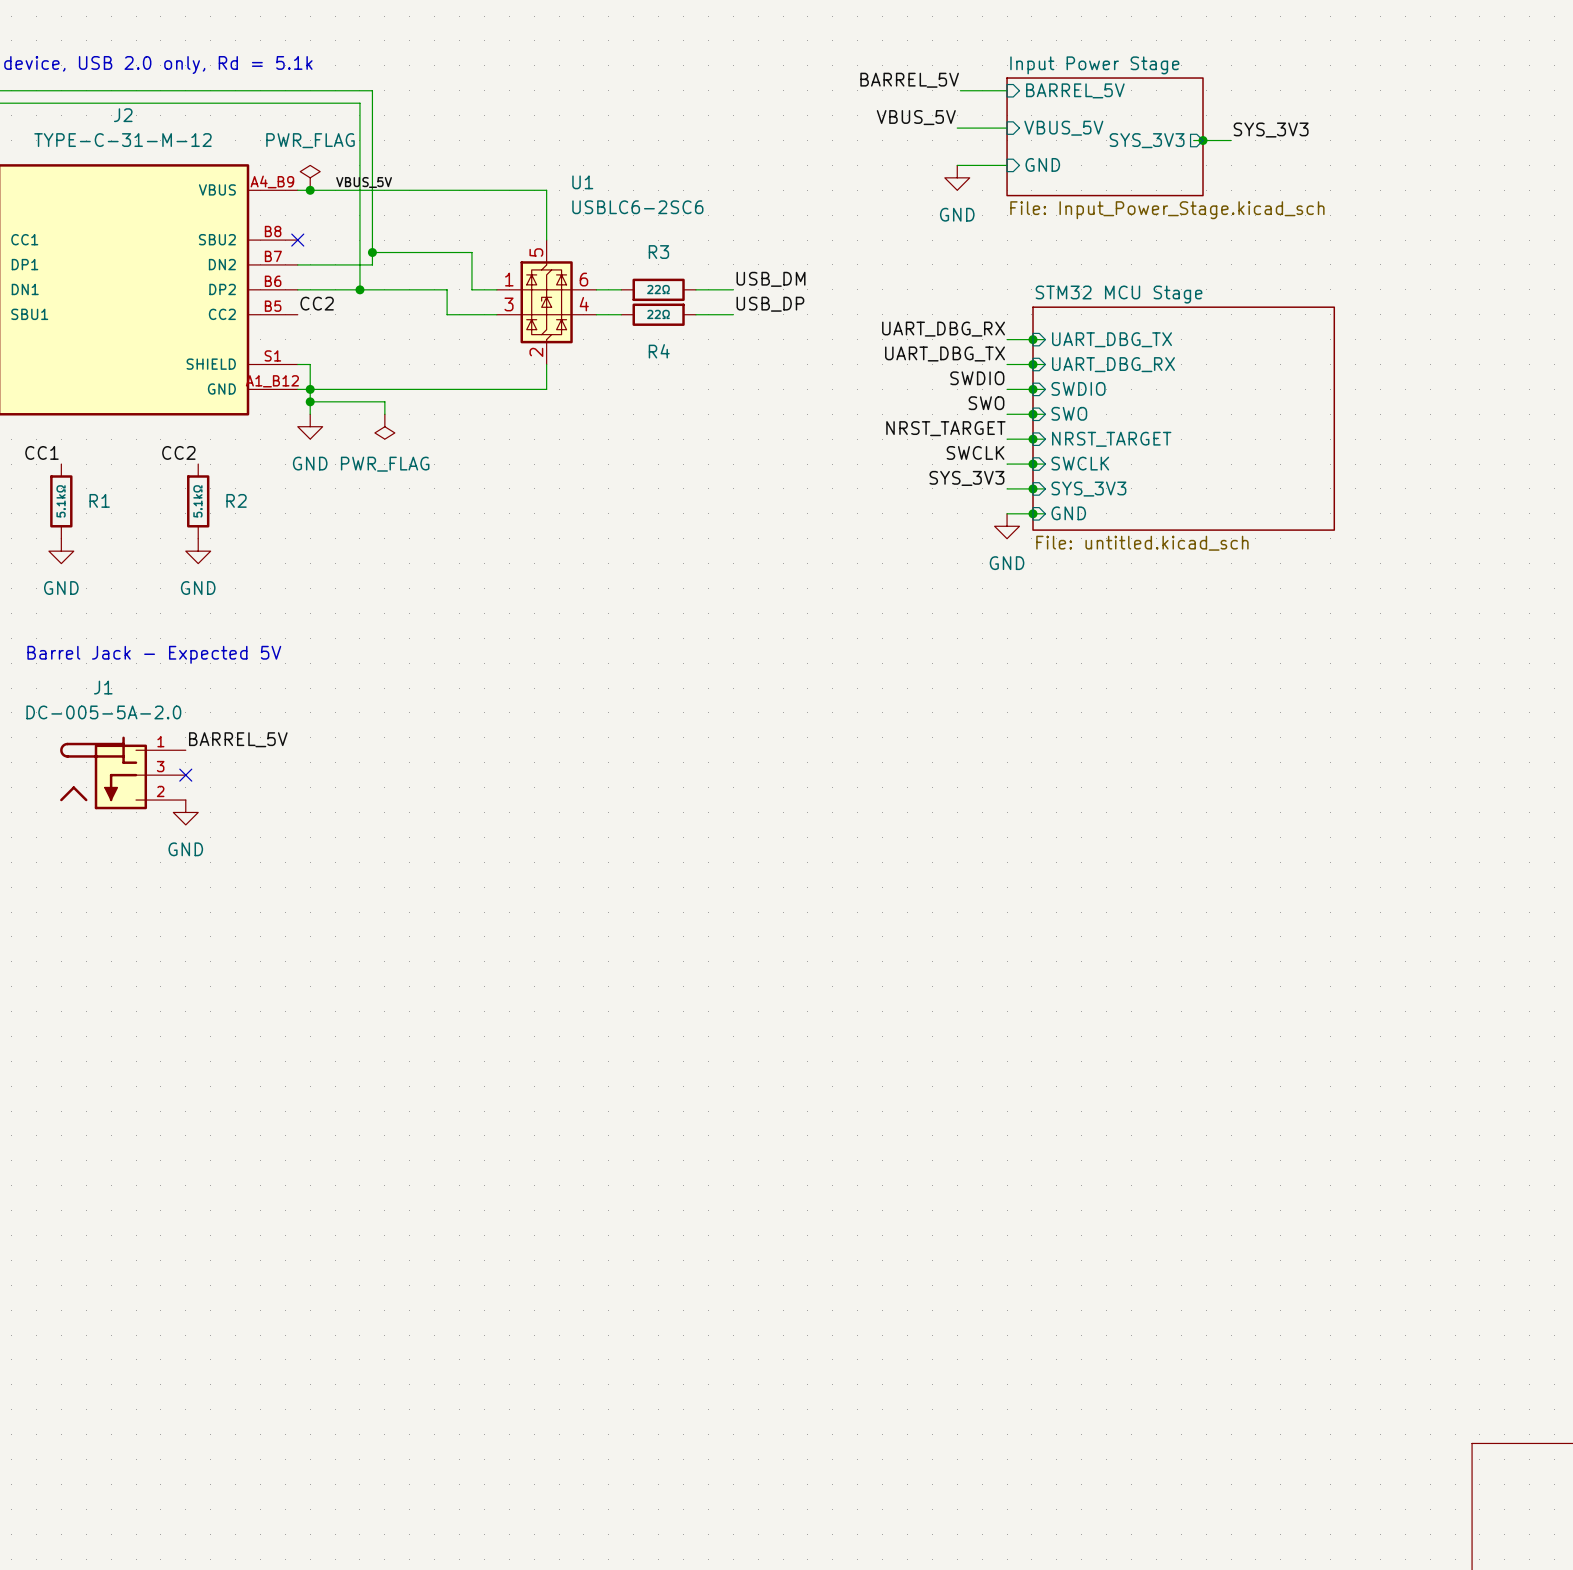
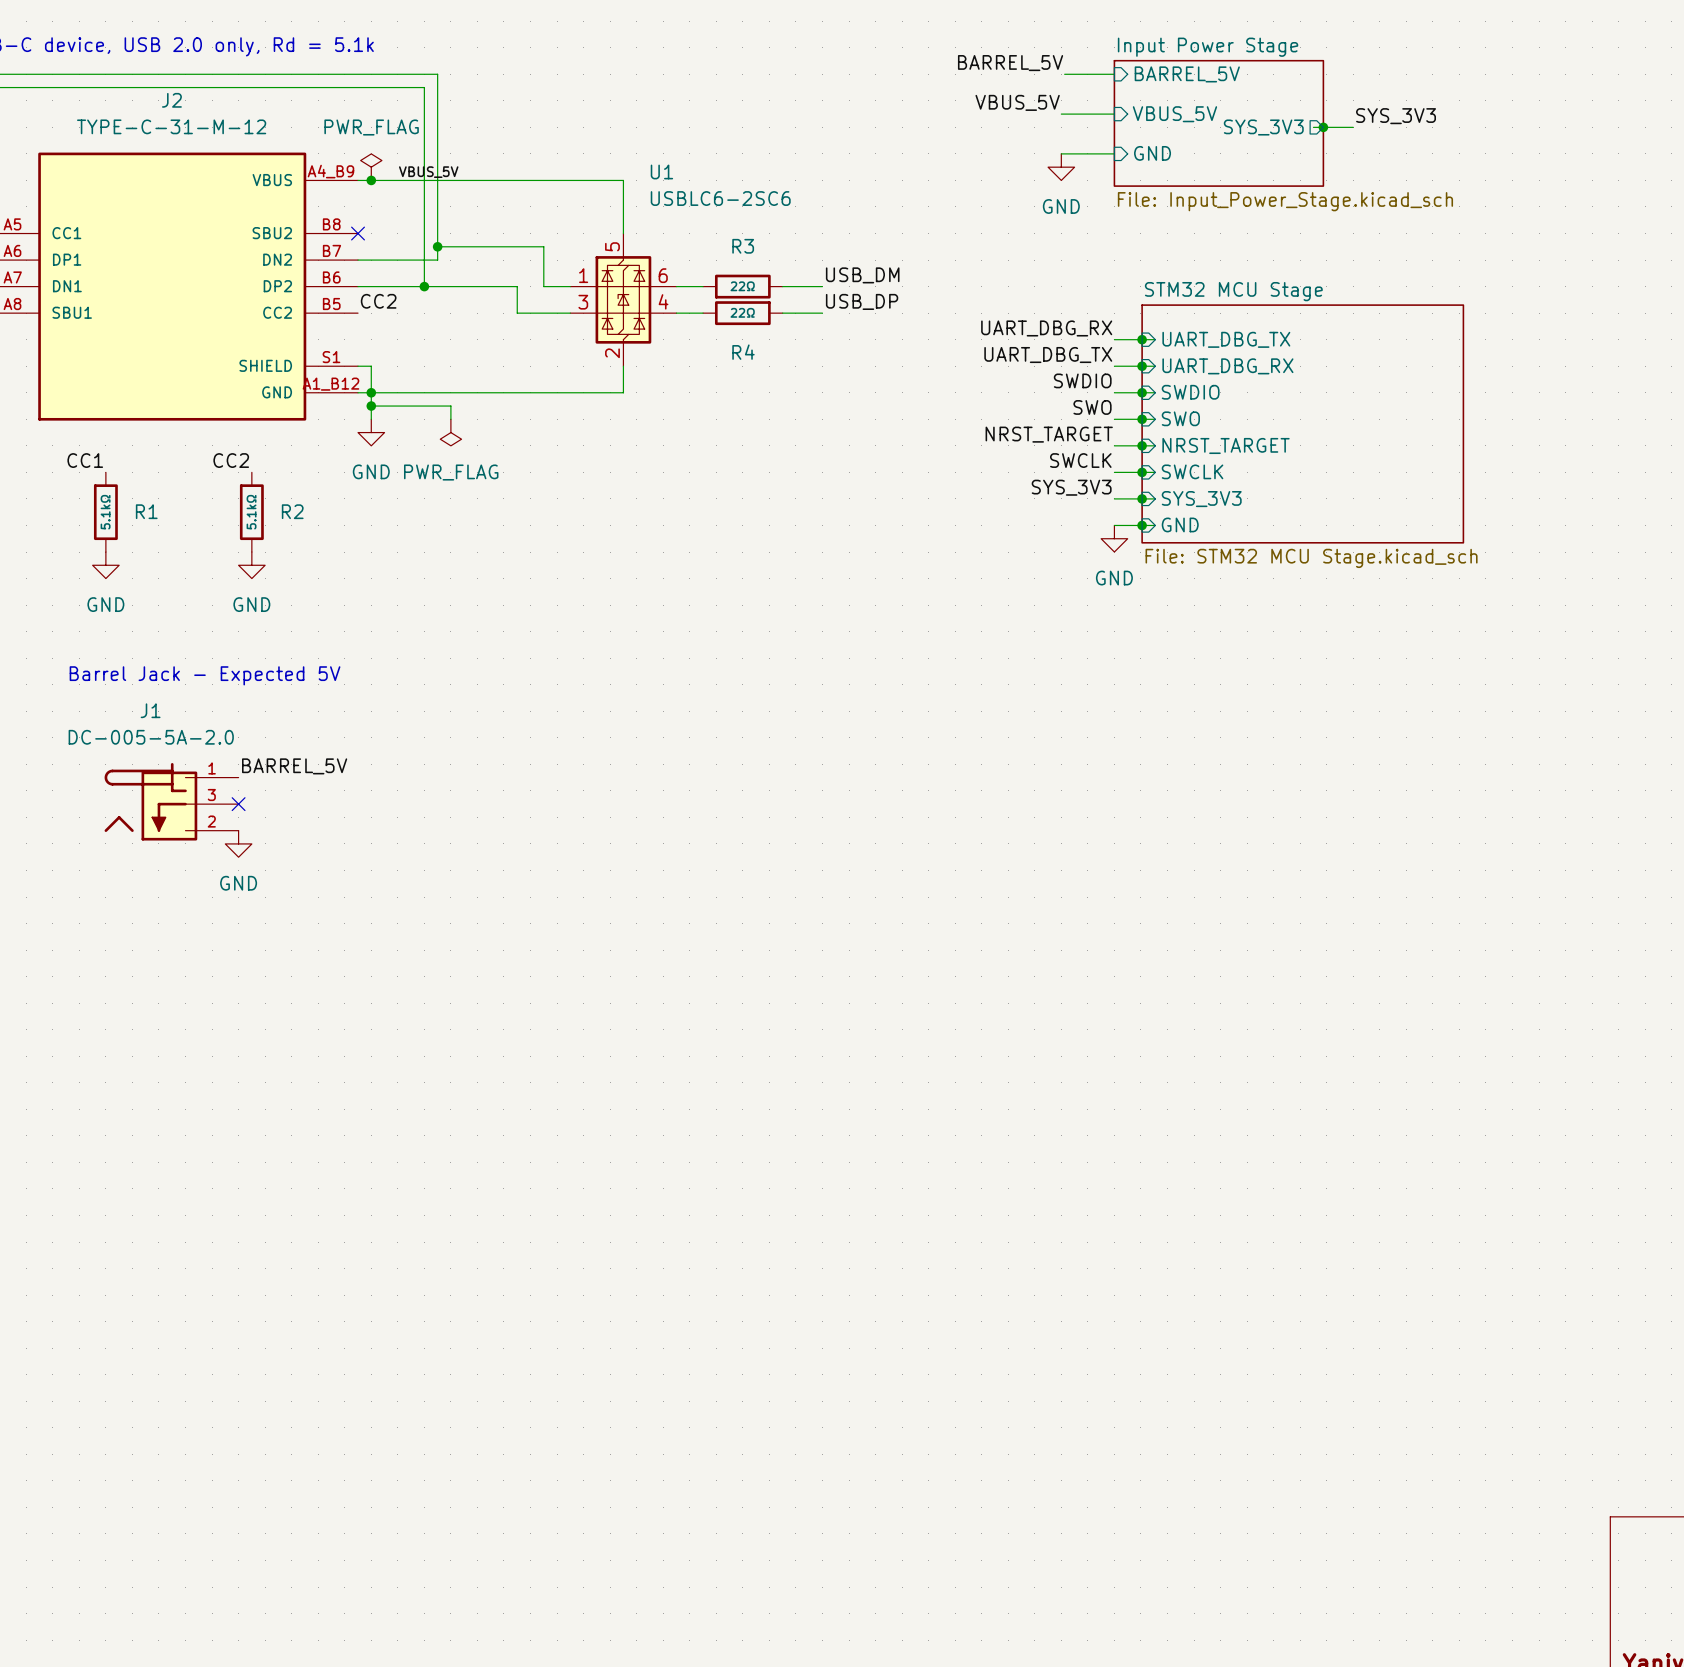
sheet STM32 MCU Stage value: File: untitled.kicad_sch (1142, 543) -> File: STM32 MCU Stage.kicad_sch (1311, 558)

